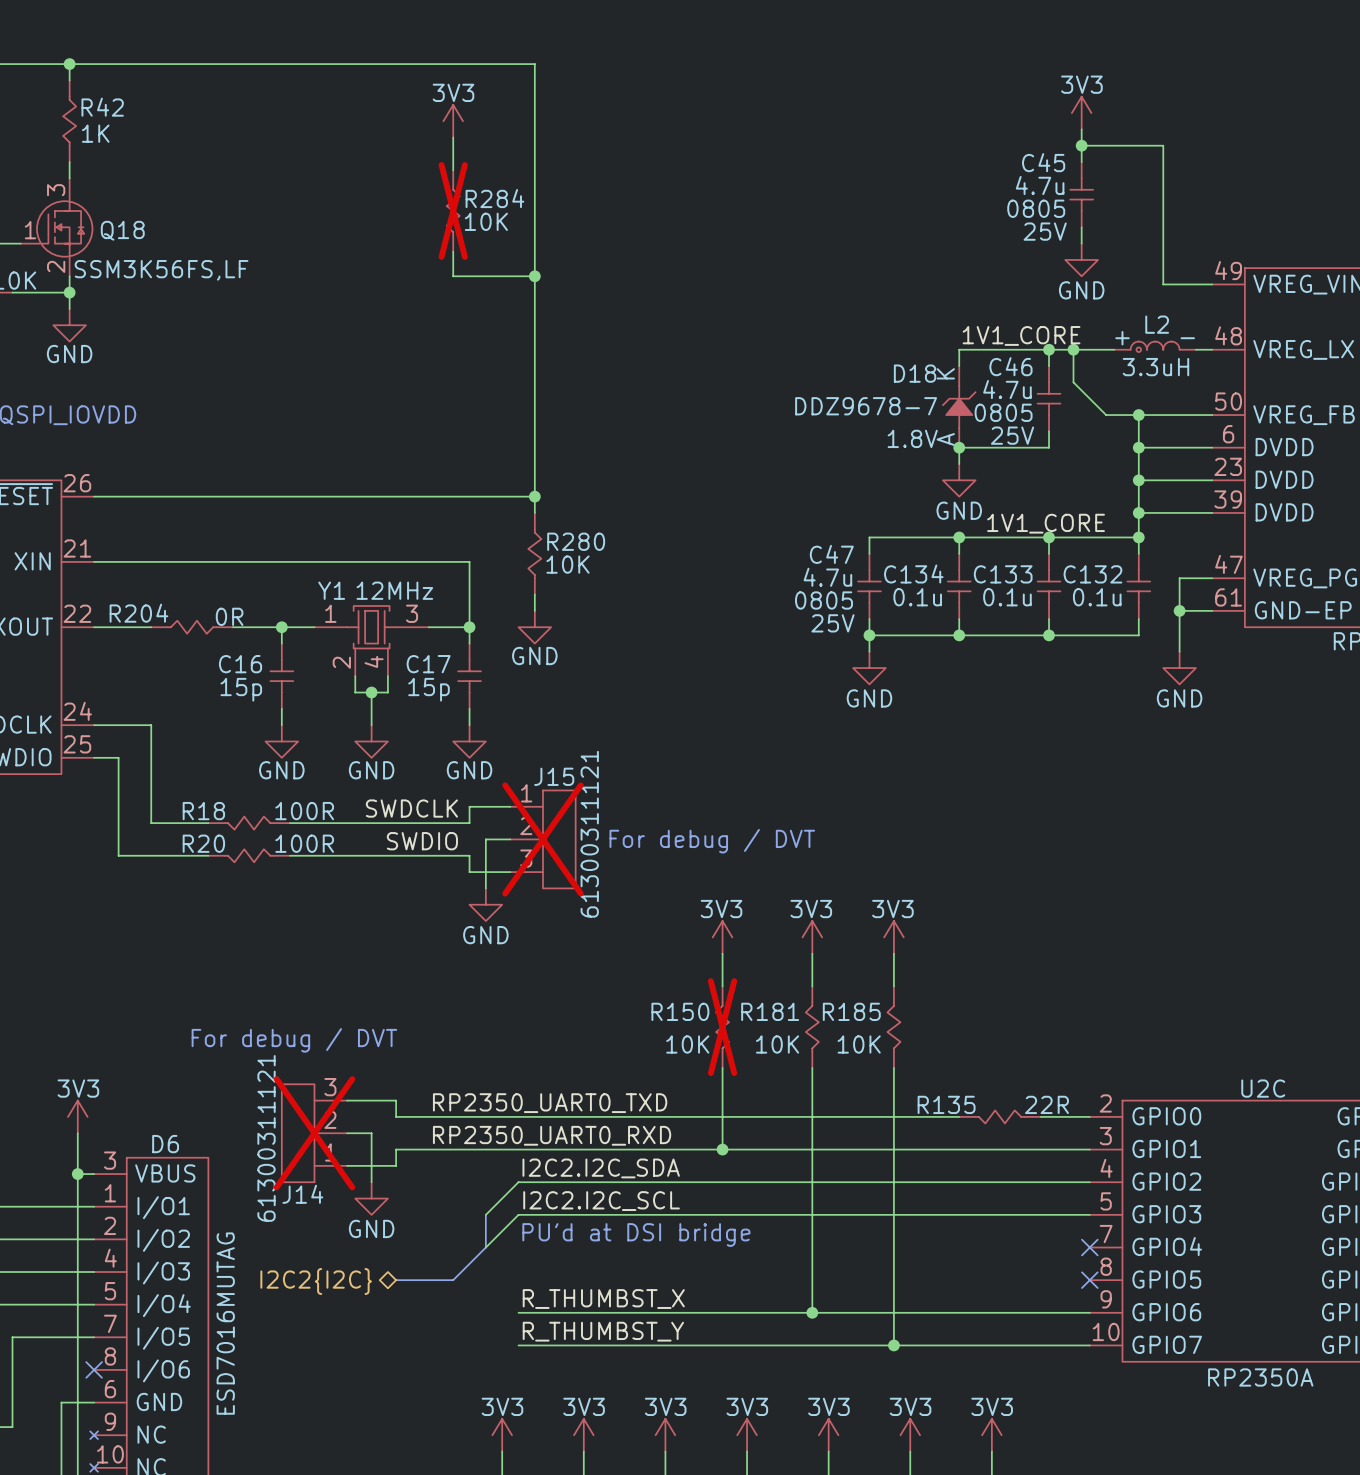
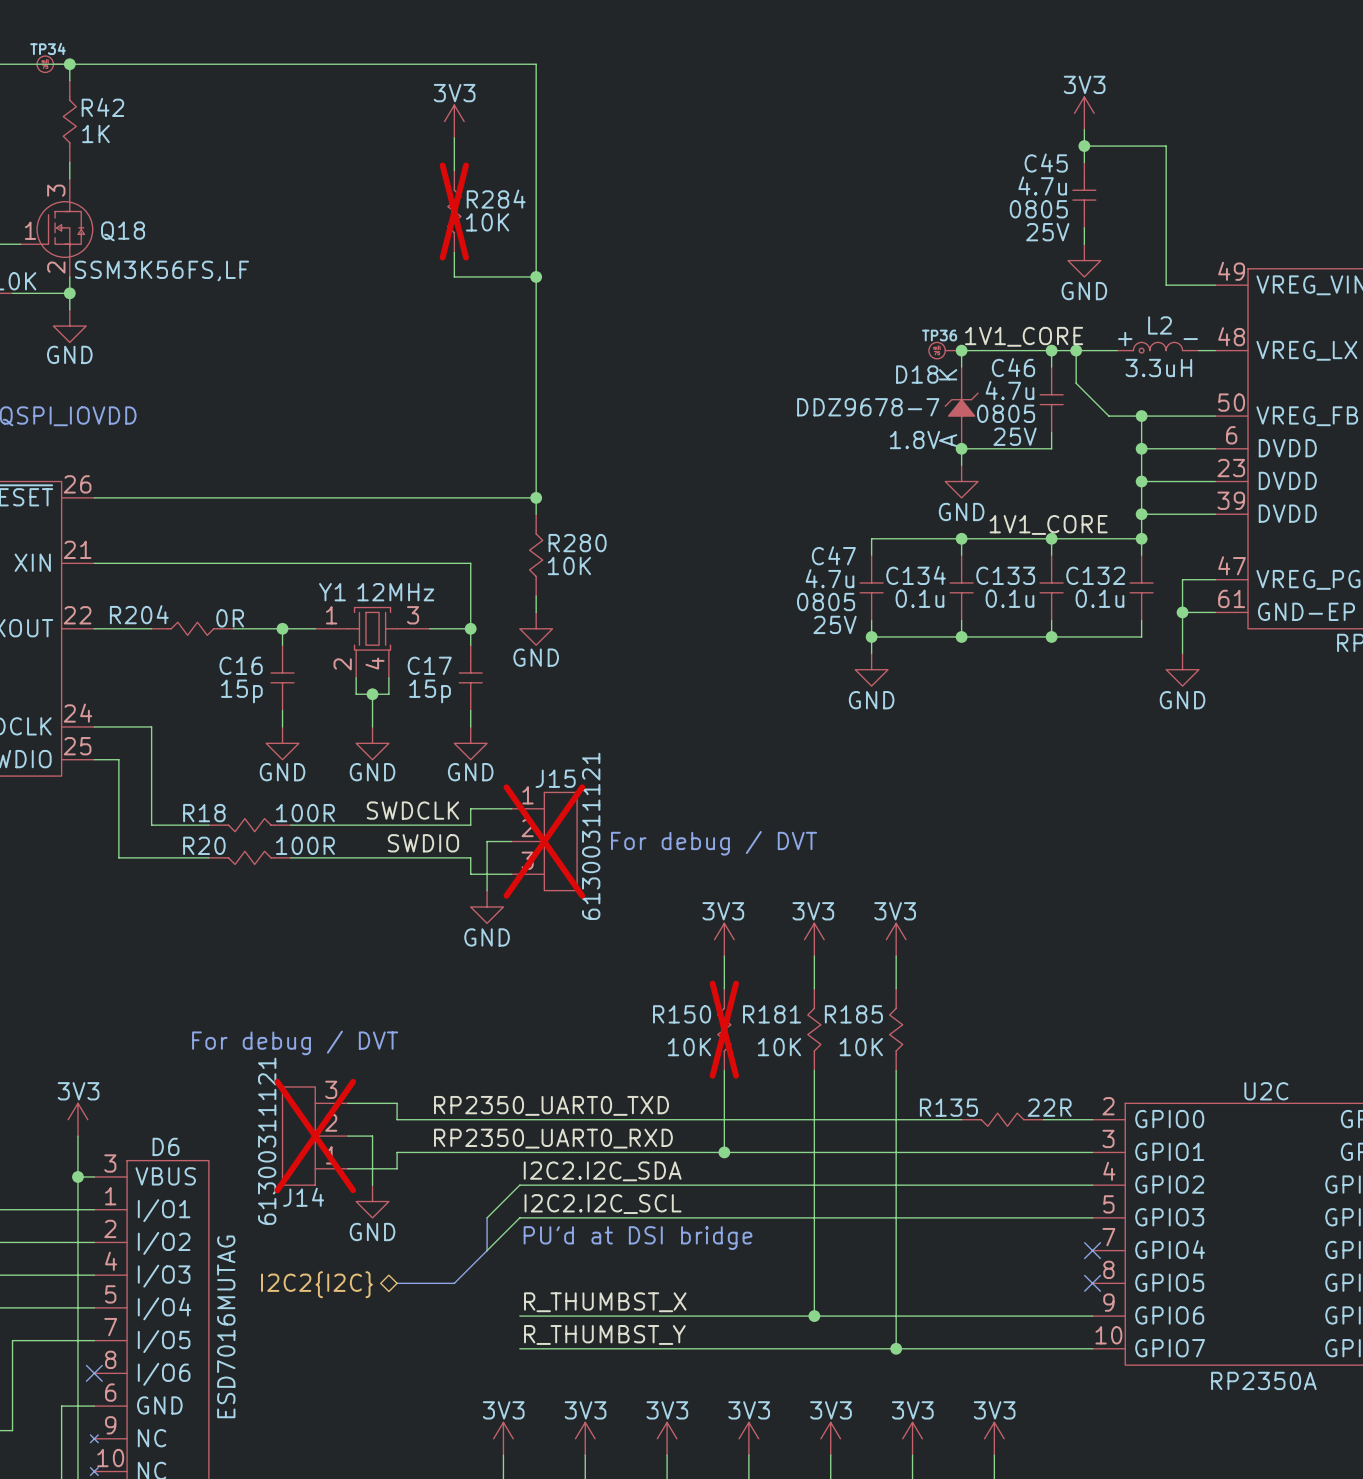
TP34: none -> (53, 64)
TP36: none -> (945, 350)
junction: none -> (961, 350)

